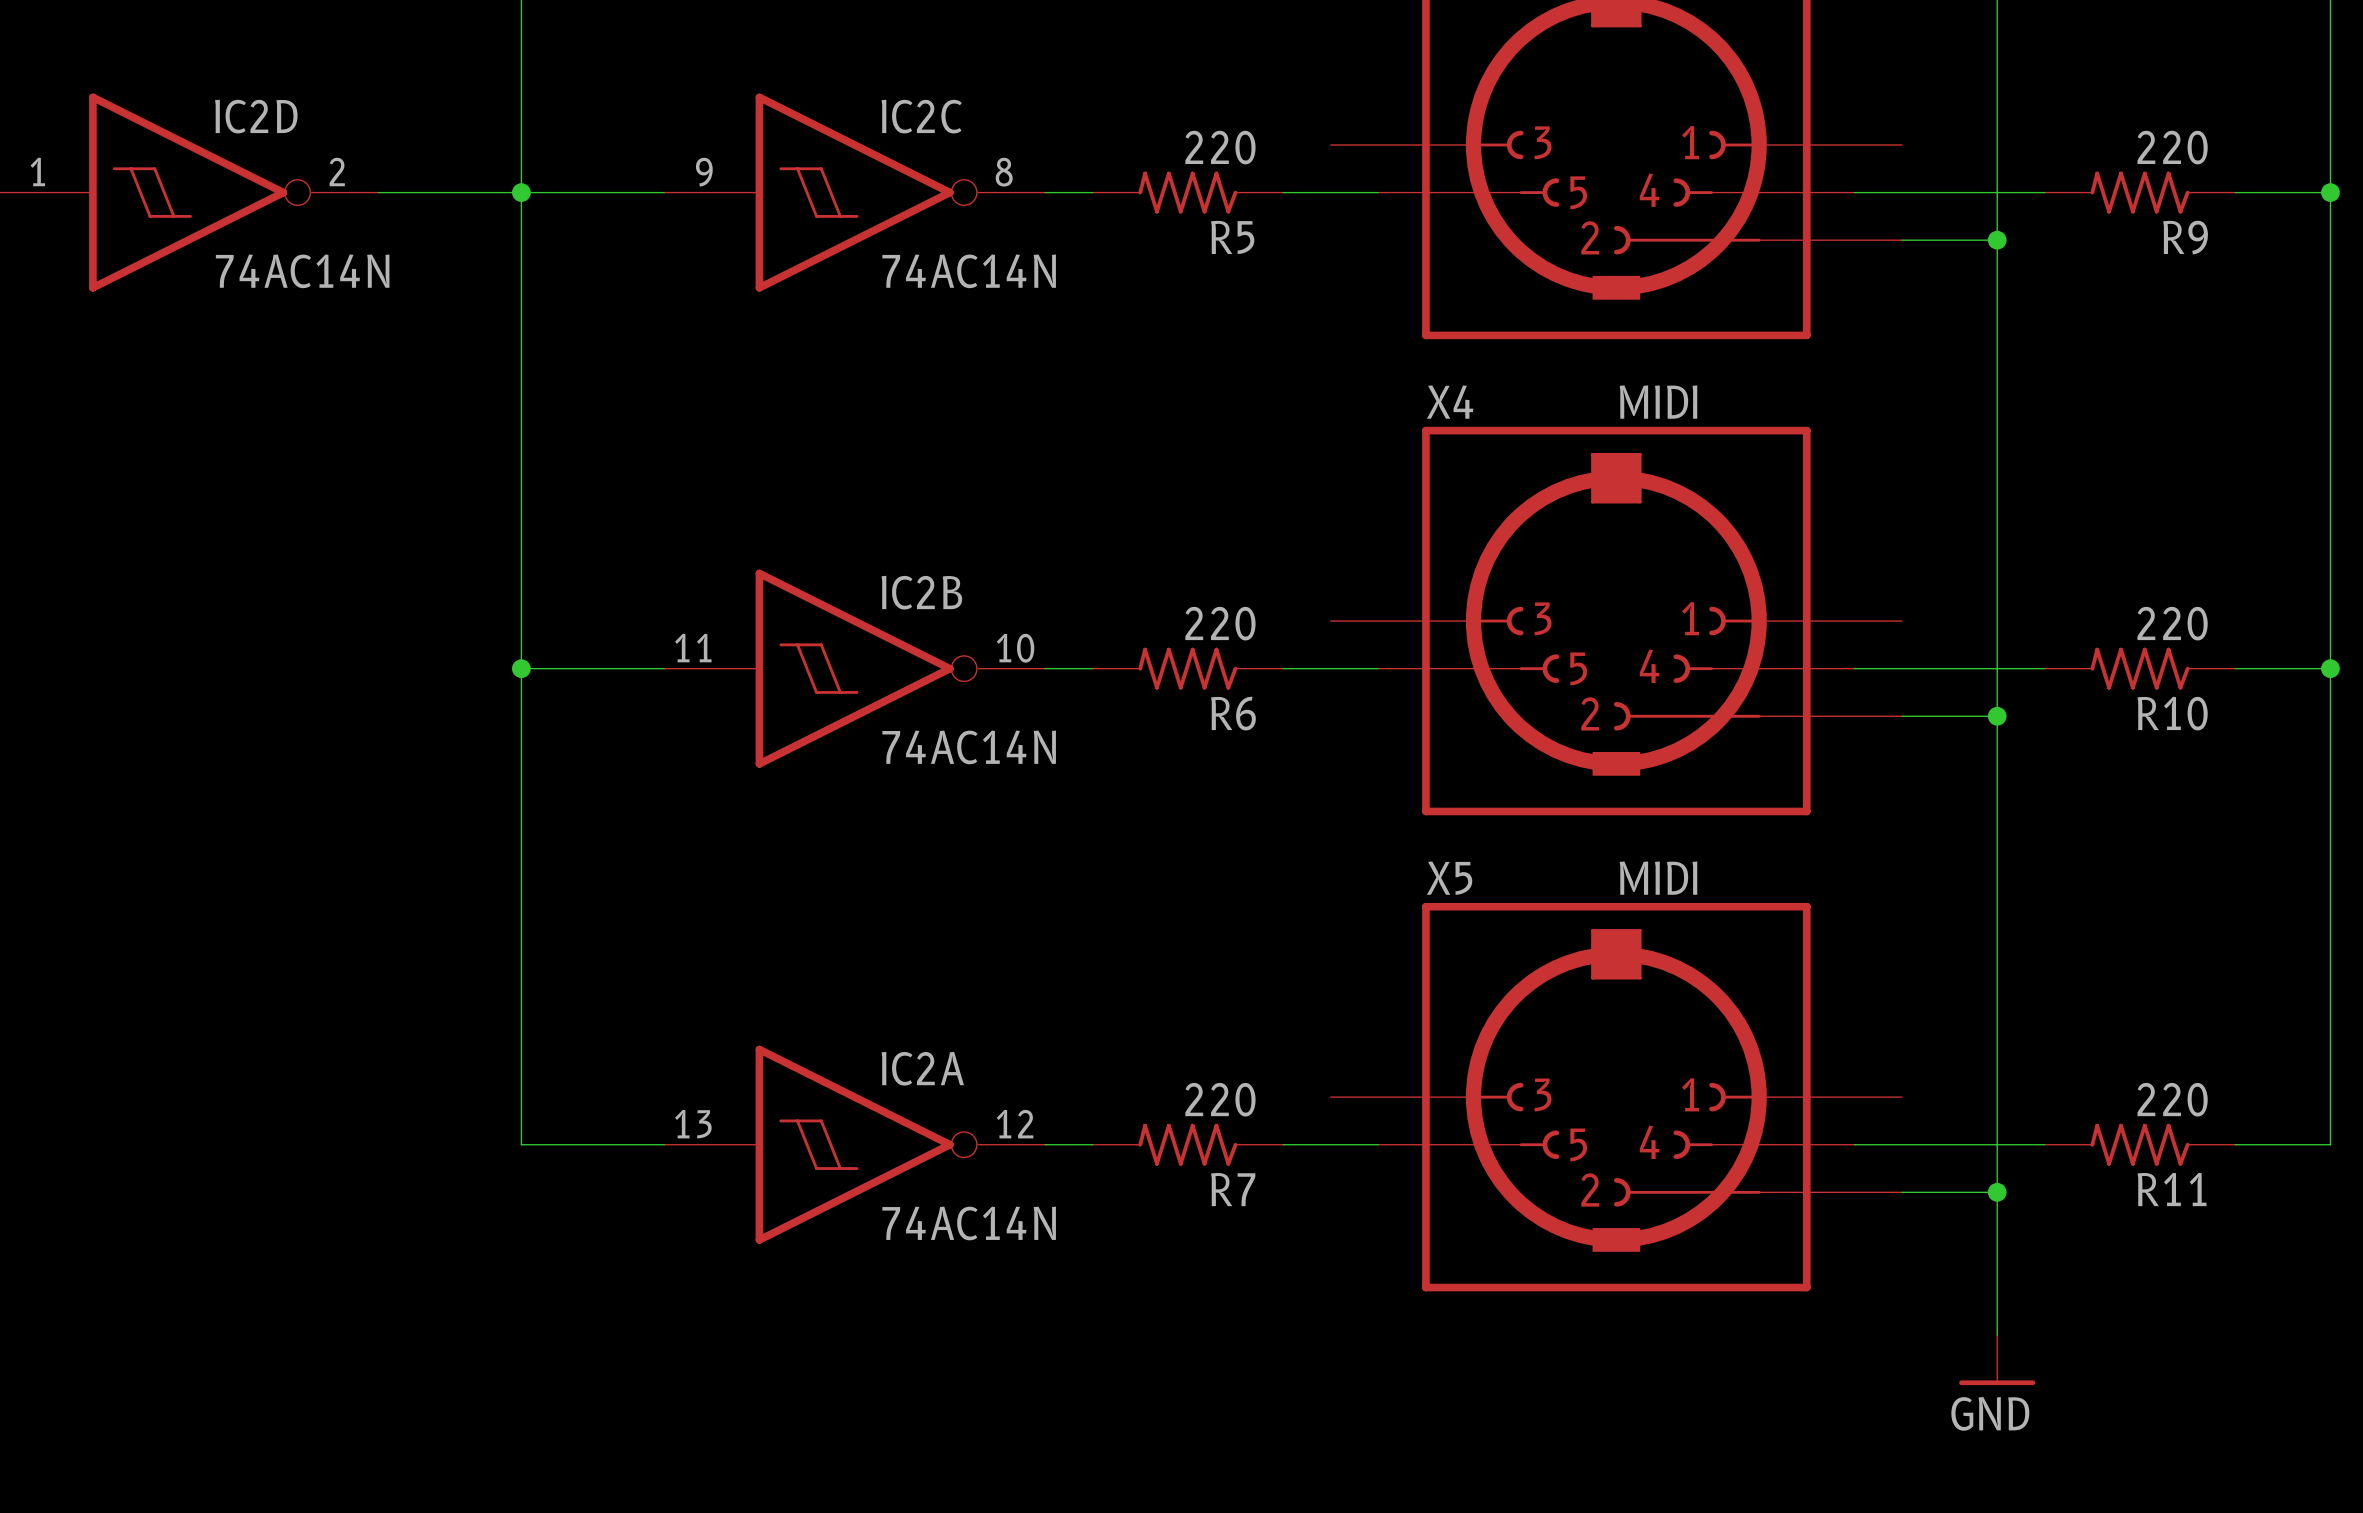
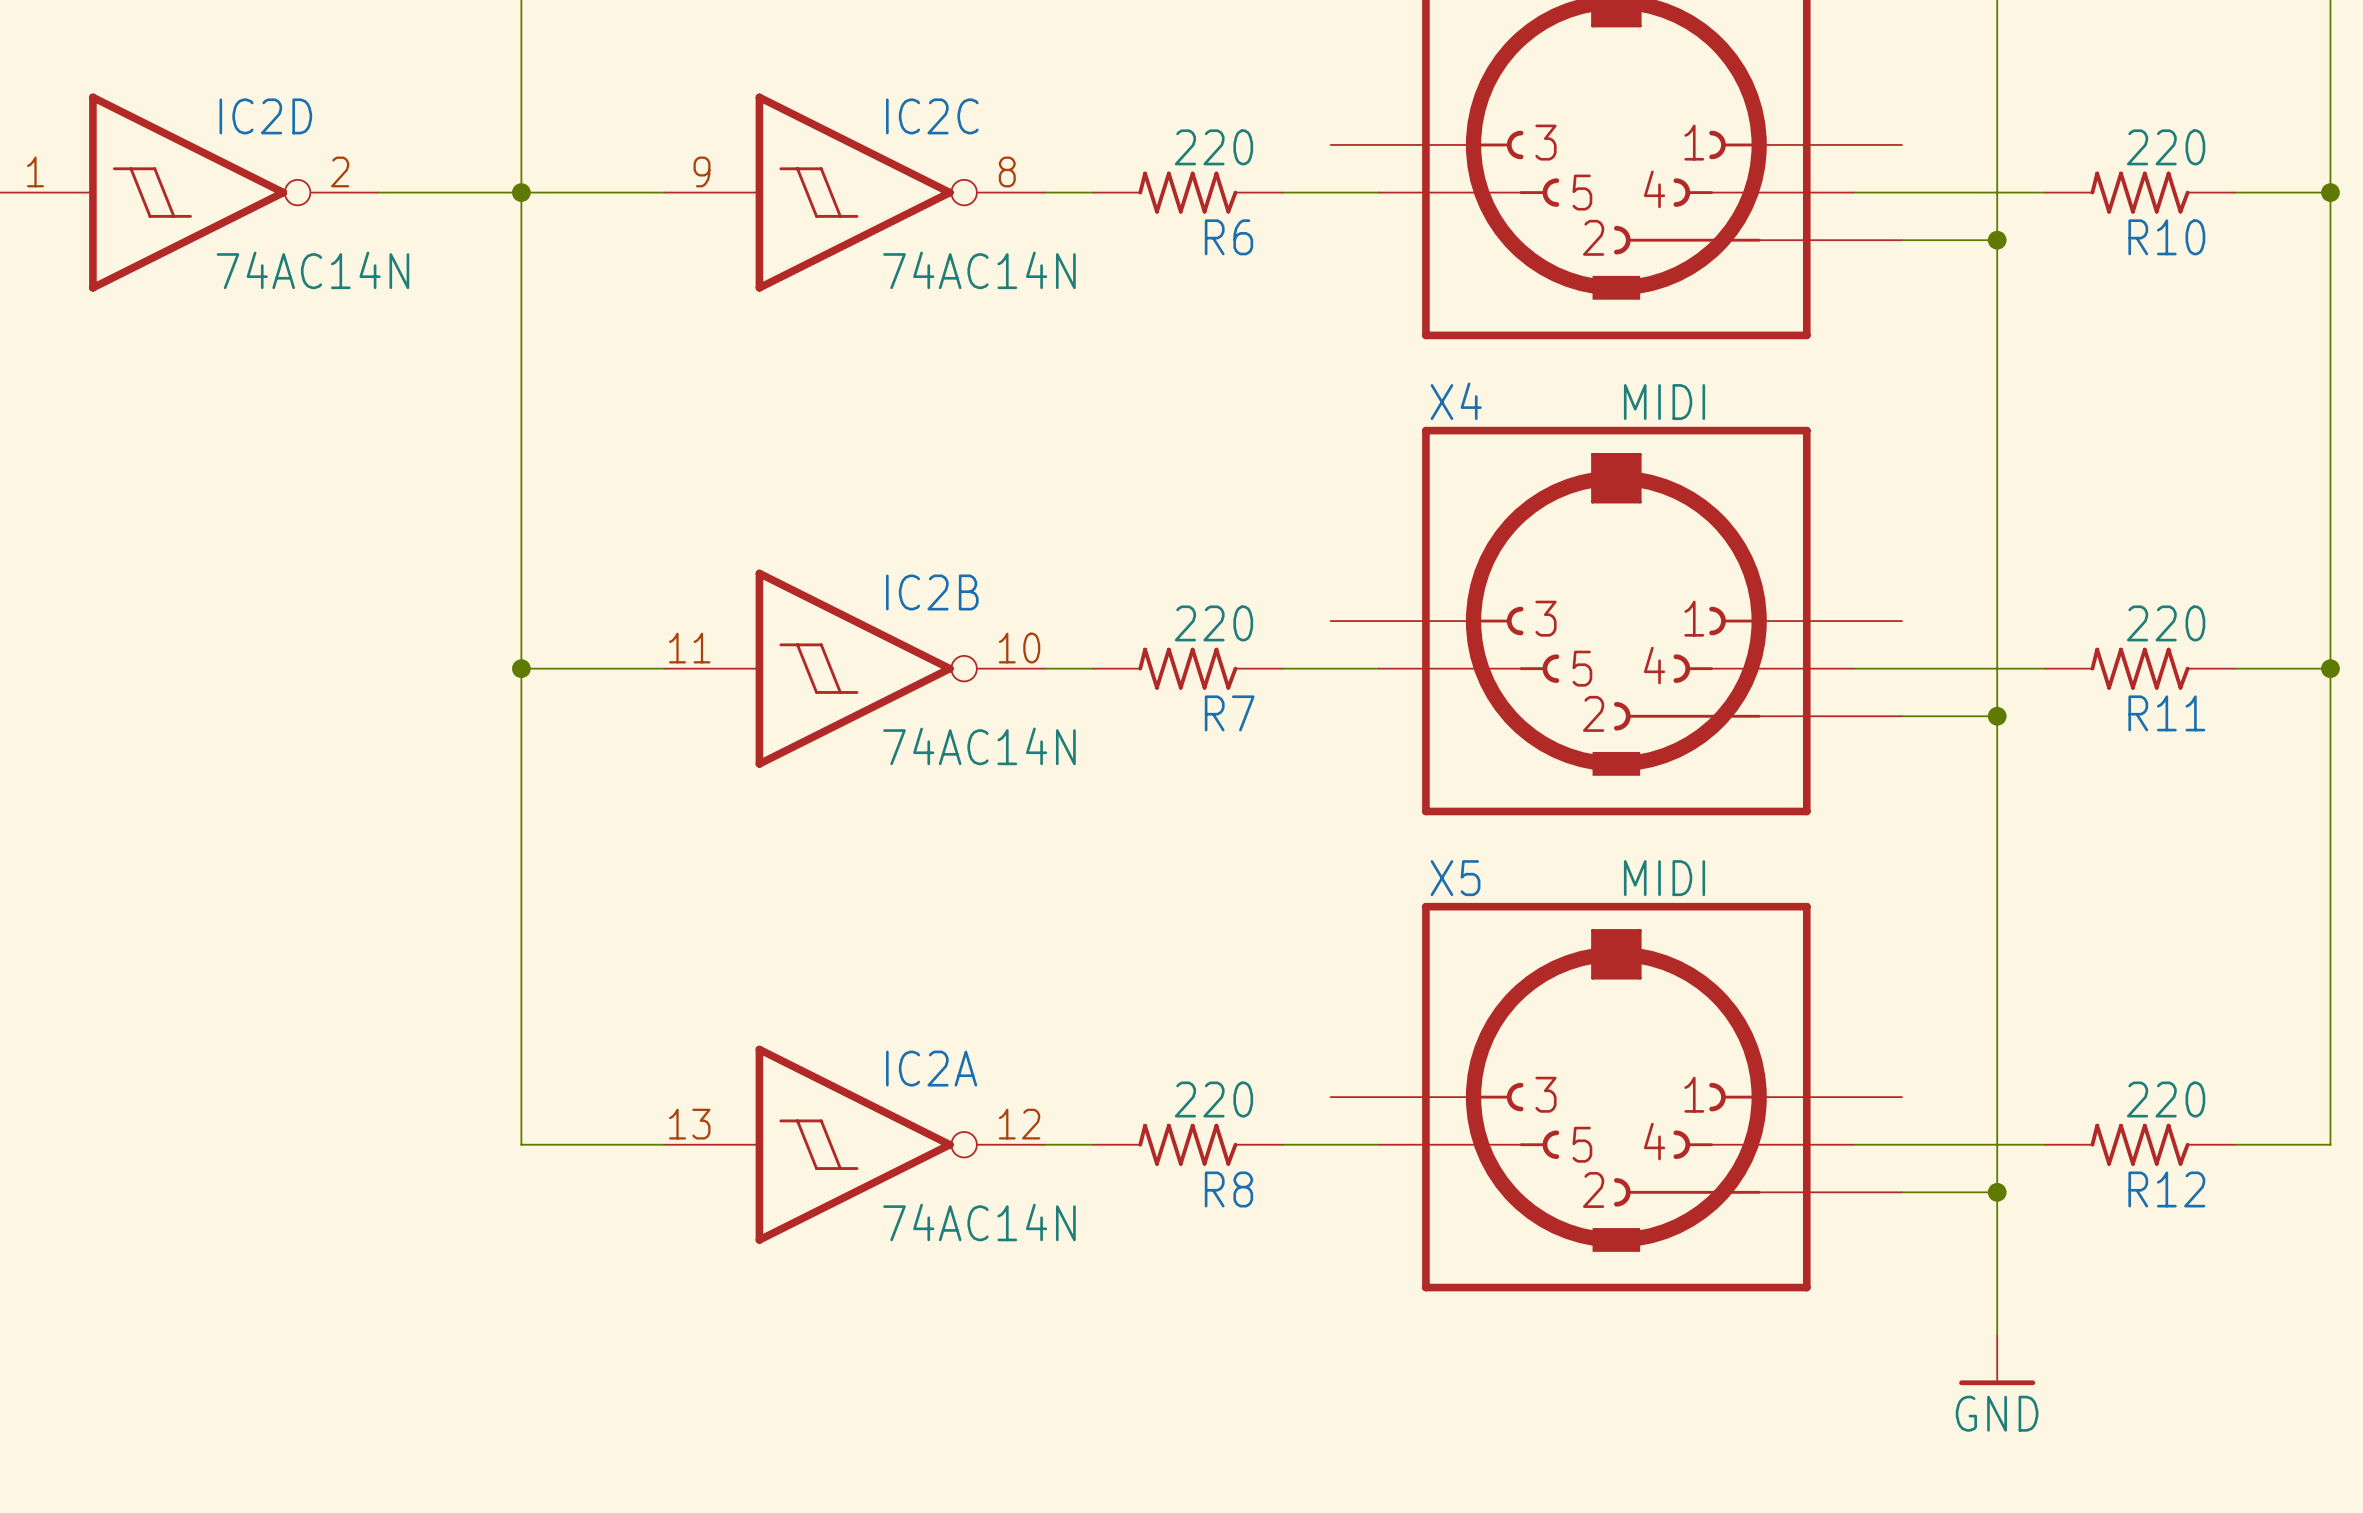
R5 name: R5 (1232, 237) -> R6 (1228, 237)
R9 name: R9 (2185, 237) -> R10 (2166, 237)
R6 name: R6 (1233, 713) -> R7 (1229, 713)
R10 name: R10 (2172, 713) -> R11 (2166, 713)
R7 name: R7 (1233, 1189) -> R8 (1228, 1189)
R11 name: R11 (2172, 1189) -> R12 (2166, 1189)

